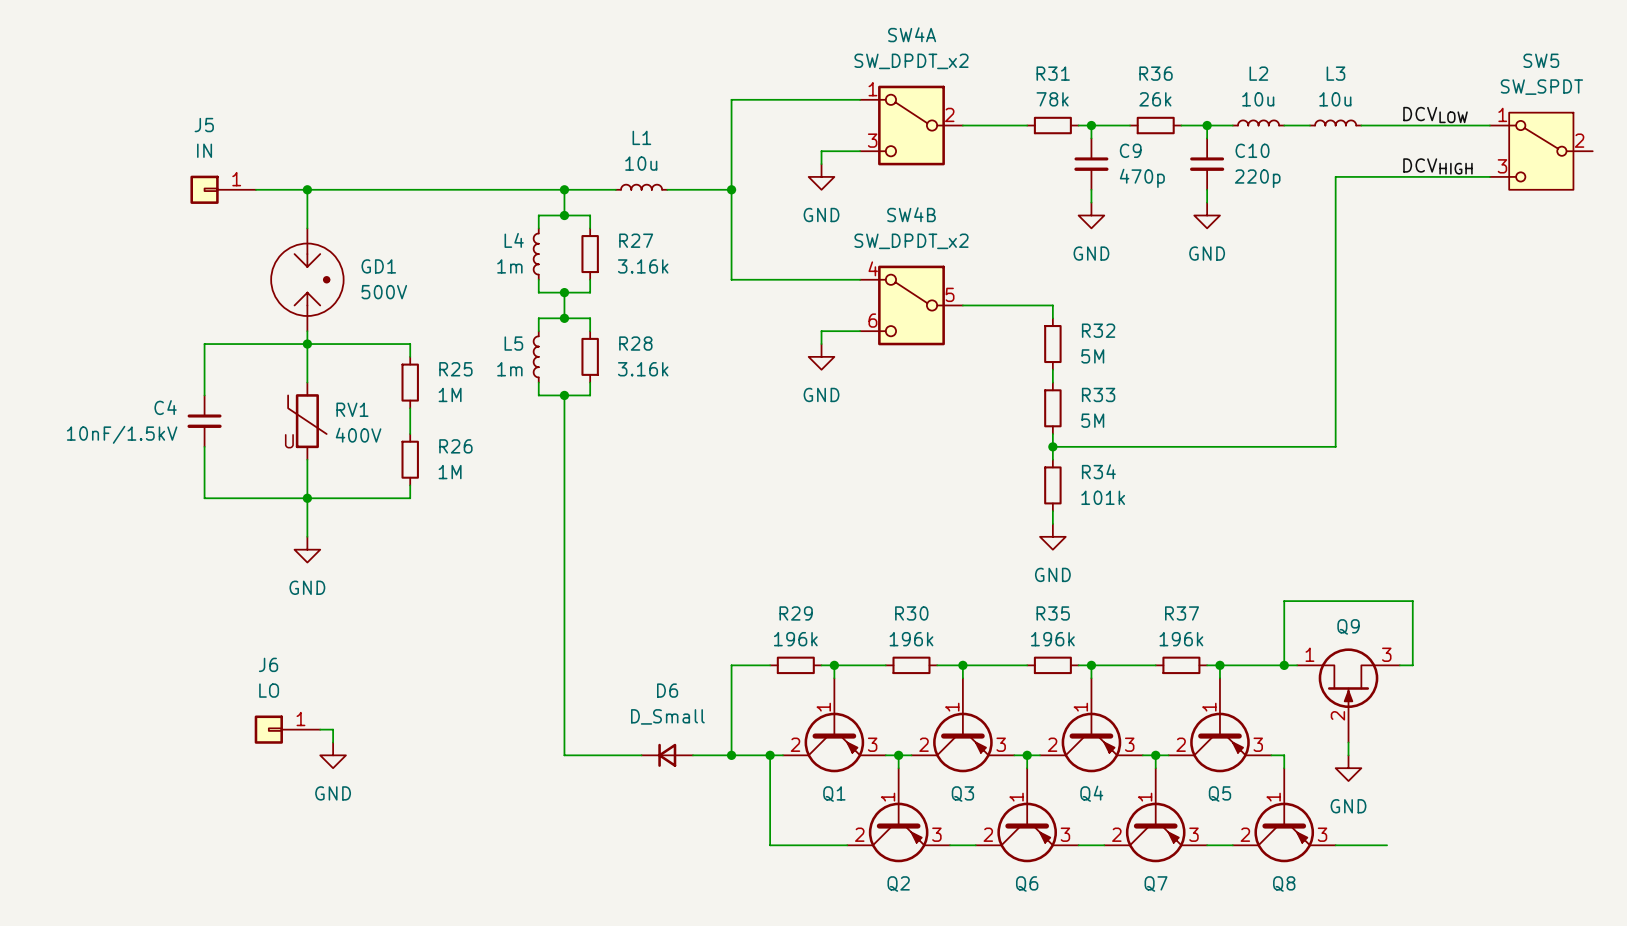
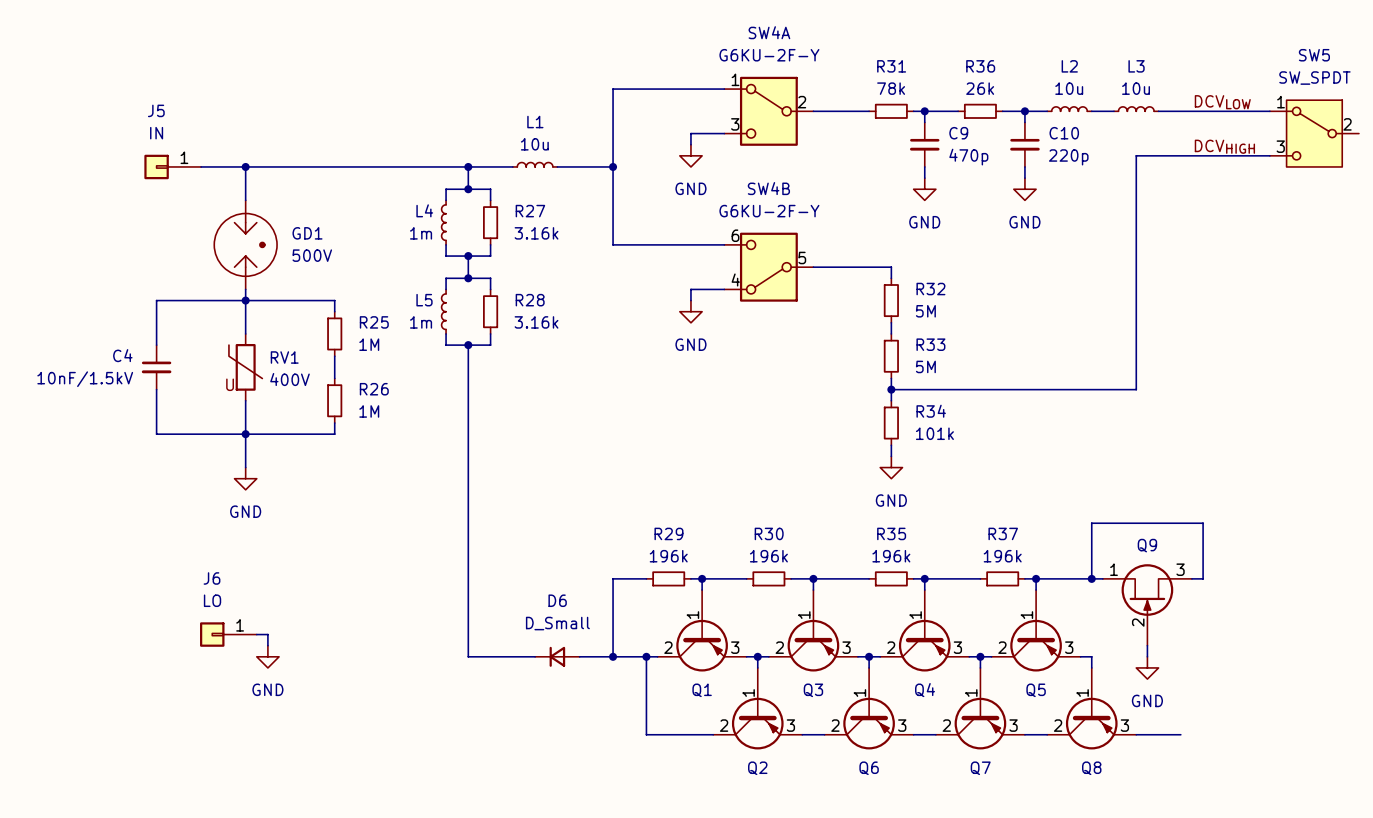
SW4A value: SW_DPDT_x2 (911, 61) -> G6KU-2F-Y (769, 55)
SW4B value: SW_DPDT_x2 (911, 241) -> G6KU-2F-Y (769, 211)
SW4B flip: as is (911, 305) -> up-down (768, 267)

